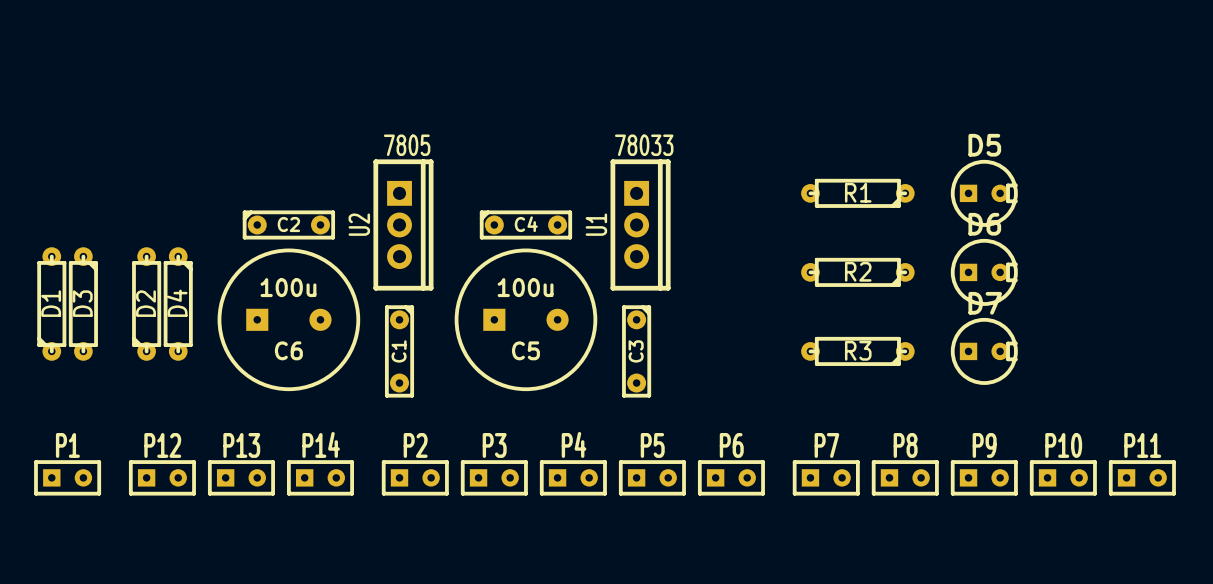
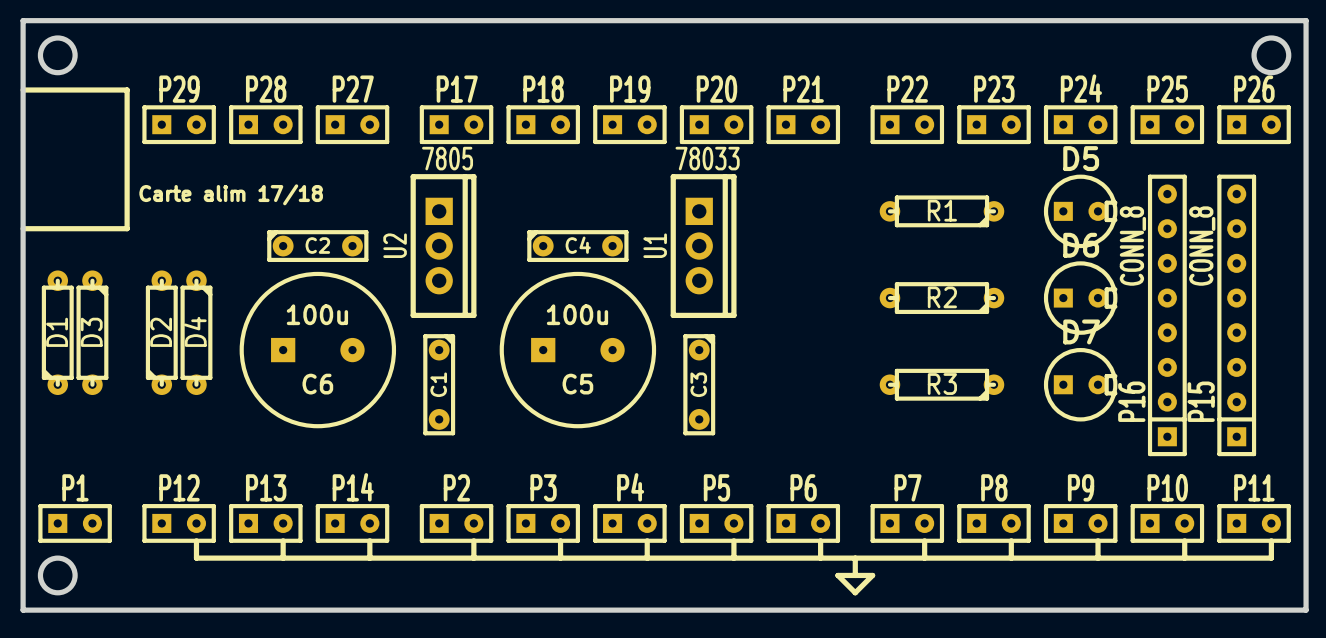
board edge: none -> (23, 20) (1306, 20) (1306, 610) (23, 610) (23, 20)
round board edge: none -> [37, 35, 78, 76]
round board edge: none -> [1251, 35, 1292, 76]
line: none -> (23, 90) (127, 90) (127, 228) (23, 228)
P29: none -> (179, 124)
P28: none -> (265, 124)
P27: none -> (352, 124)
P17: none -> (456, 124)
P18: none -> (543, 124)
P19: none -> (629, 124)
P20: none -> (716, 124)
P21: none -> (803, 124)
P22: none -> (907, 124)
P23: none -> (993, 124)
P24: none -> (1080, 124)
P25: none -> (1167, 124)
P26: none -> (1254, 124)
text: none -> Carte alim 17/18 (231, 194)
P16: none -> CONN_8 (1167, 315)
P15: none -> CONN_8 (1236, 315)
line: none -> (196, 540) (196, 558) (1271, 558) (1271, 540)
line: none -> (283, 540) (283, 558)
line: none -> (369, 540) (369, 558)
line: none -> (473, 540) (473, 558)
line: none -> (560, 540) (560, 558)
line: none -> (647, 540) (647, 558)
line: none -> (733, 540) (733, 558)
line: none -> (820, 540) (820, 558)
line: none -> (924, 540) (924, 558)
line: none -> (1011, 540) (1011, 558)
line: none -> (1098, 540) (1098, 558)
line: none -> (1184, 540) (1184, 558)
round board edge: none -> [37, 555, 78, 596]
line: none -> (855, 558) (855, 575)
line: none -> (837, 575) (872, 575) (855, 592) (837, 575)

